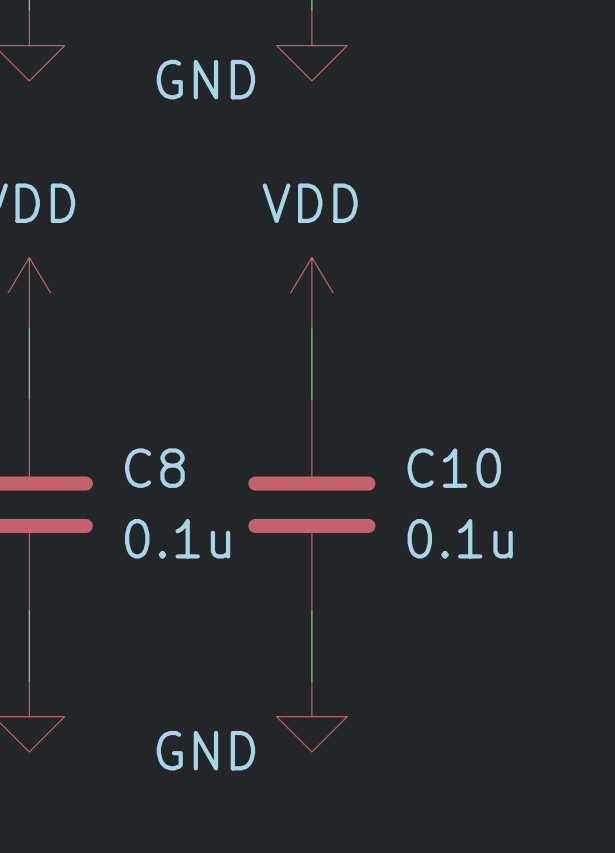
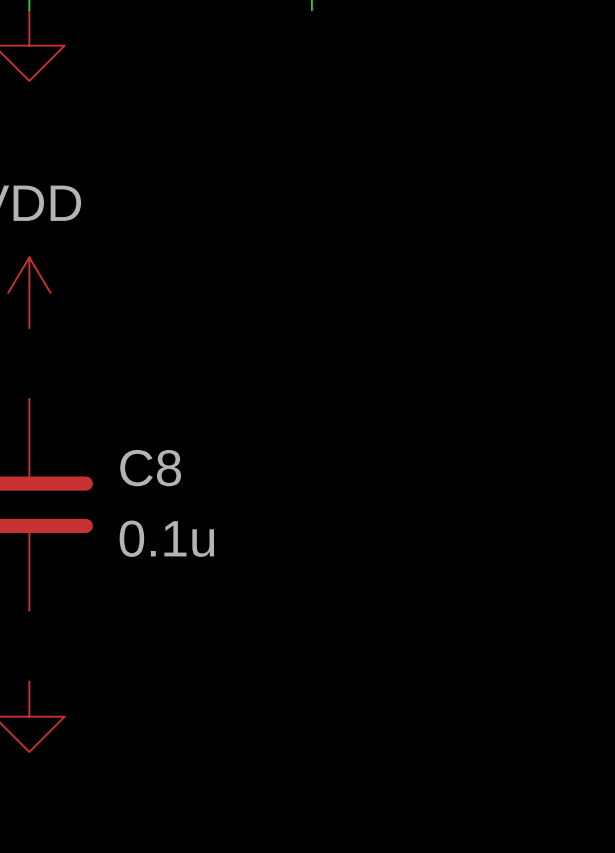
power symbol: GND (311, 45) -> none
power symbol: VDD (311, 292) -> none
wire: (29, 328) (29, 398) -> none
wire: (311, 328) (311, 398) -> none
C10: 0.1u (311, 504) -> none
wire: (29, 610) (29, 681) -> none
wire: (311, 610) (311, 681) -> none
power symbol: GND (311, 716) -> none

